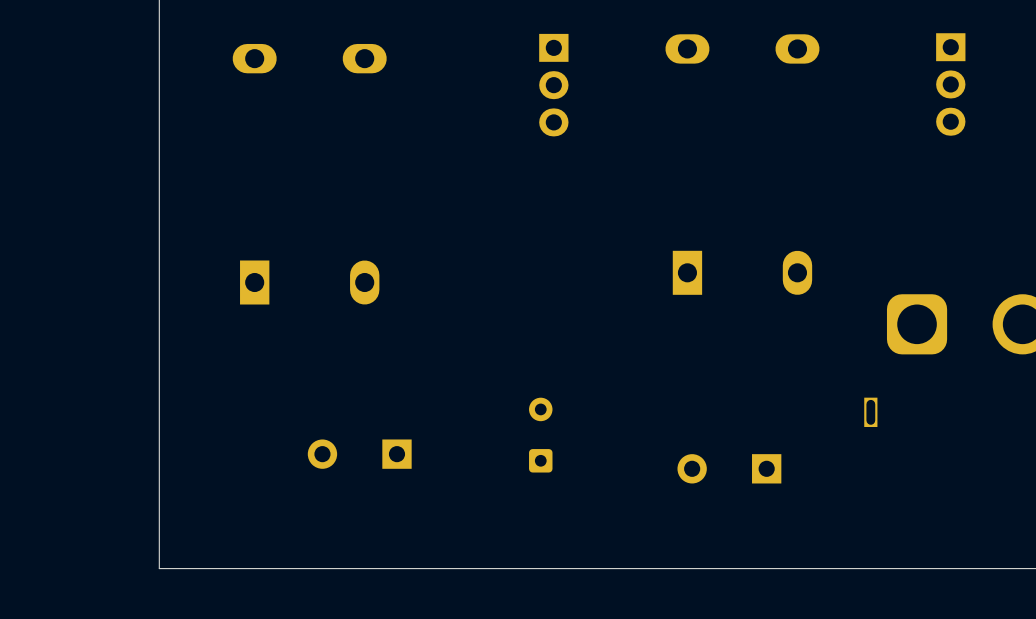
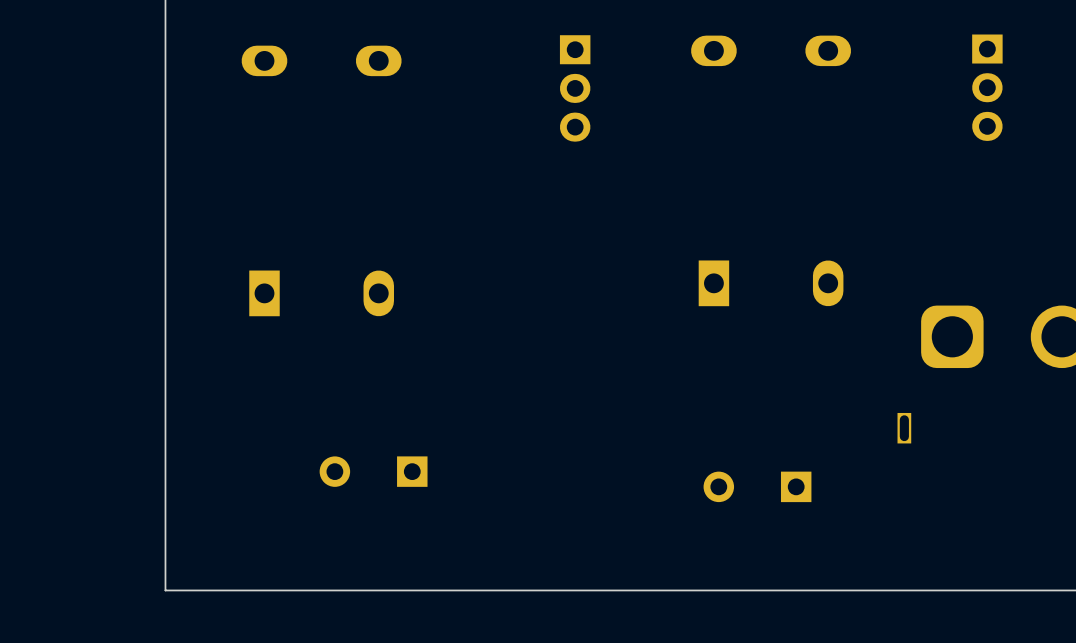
part: (540, 435) -> none

